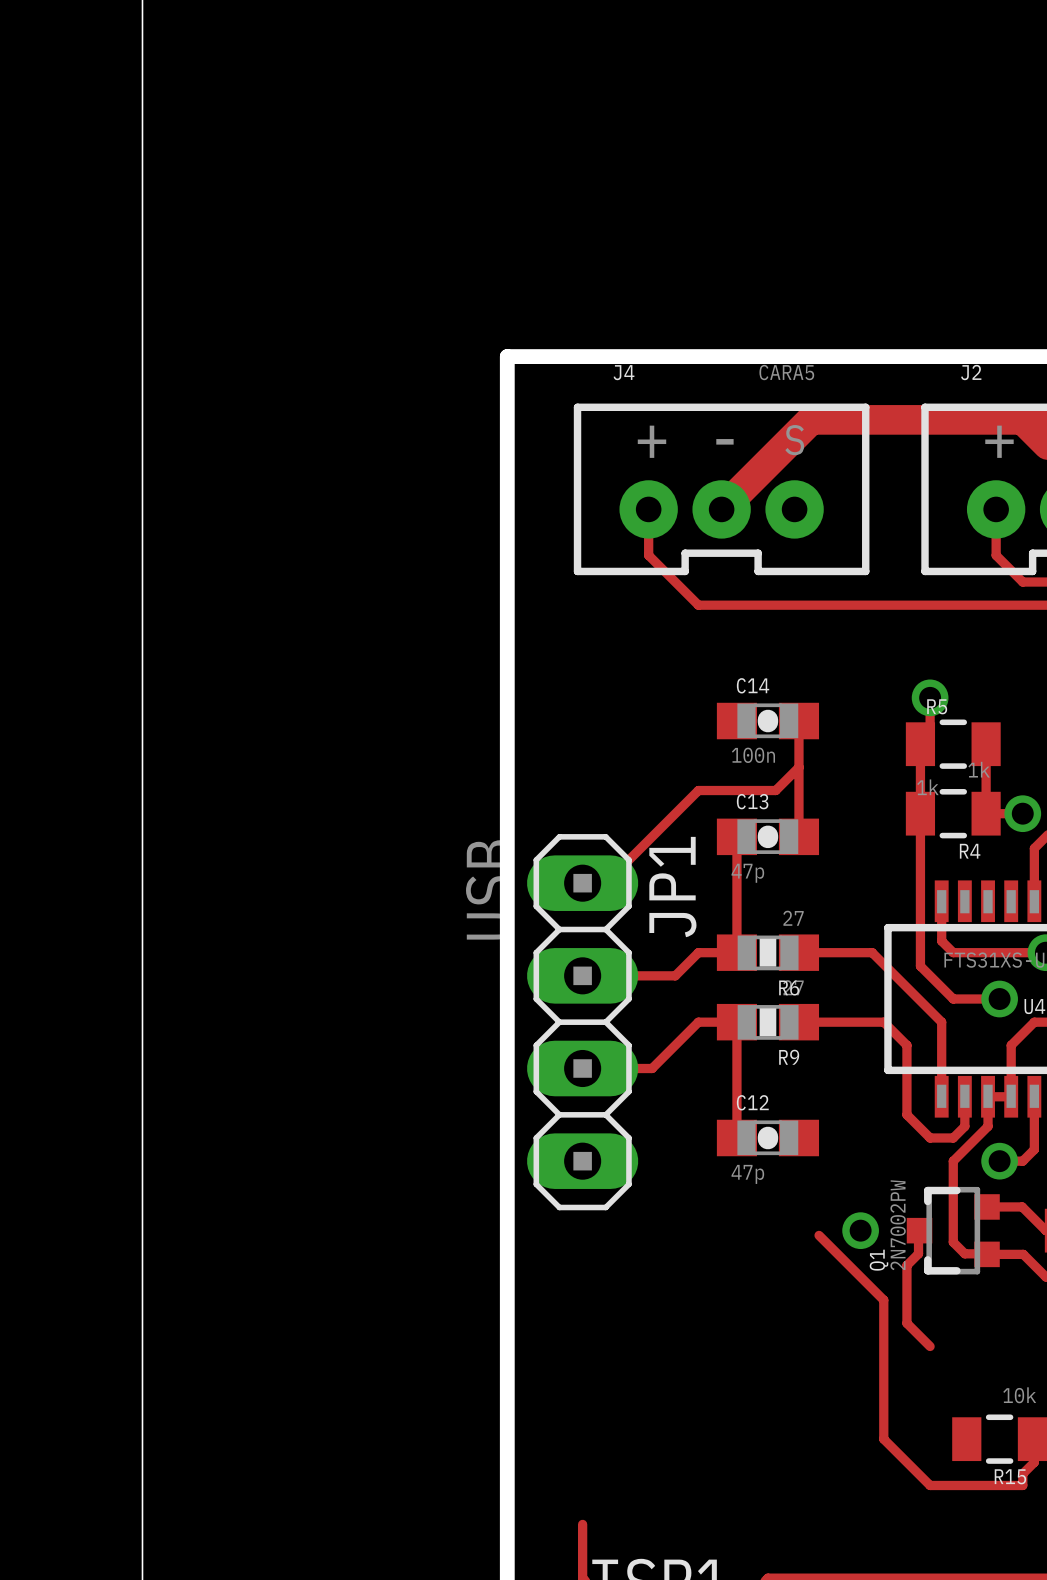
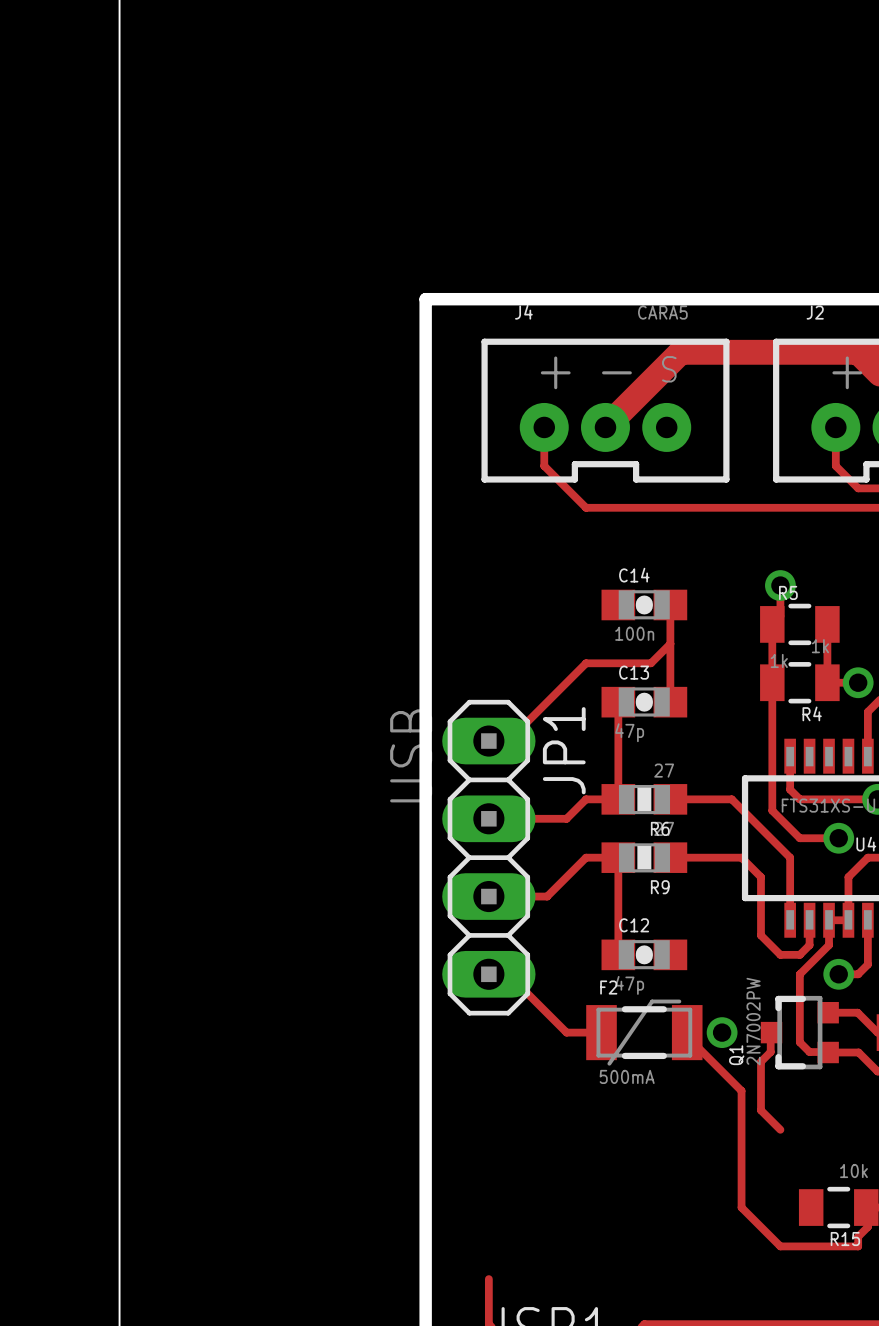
track: none -> (488, 974) (508, 974) (566, 1032) (601, 1032)
F2: none -> 500mA (644, 1032)

